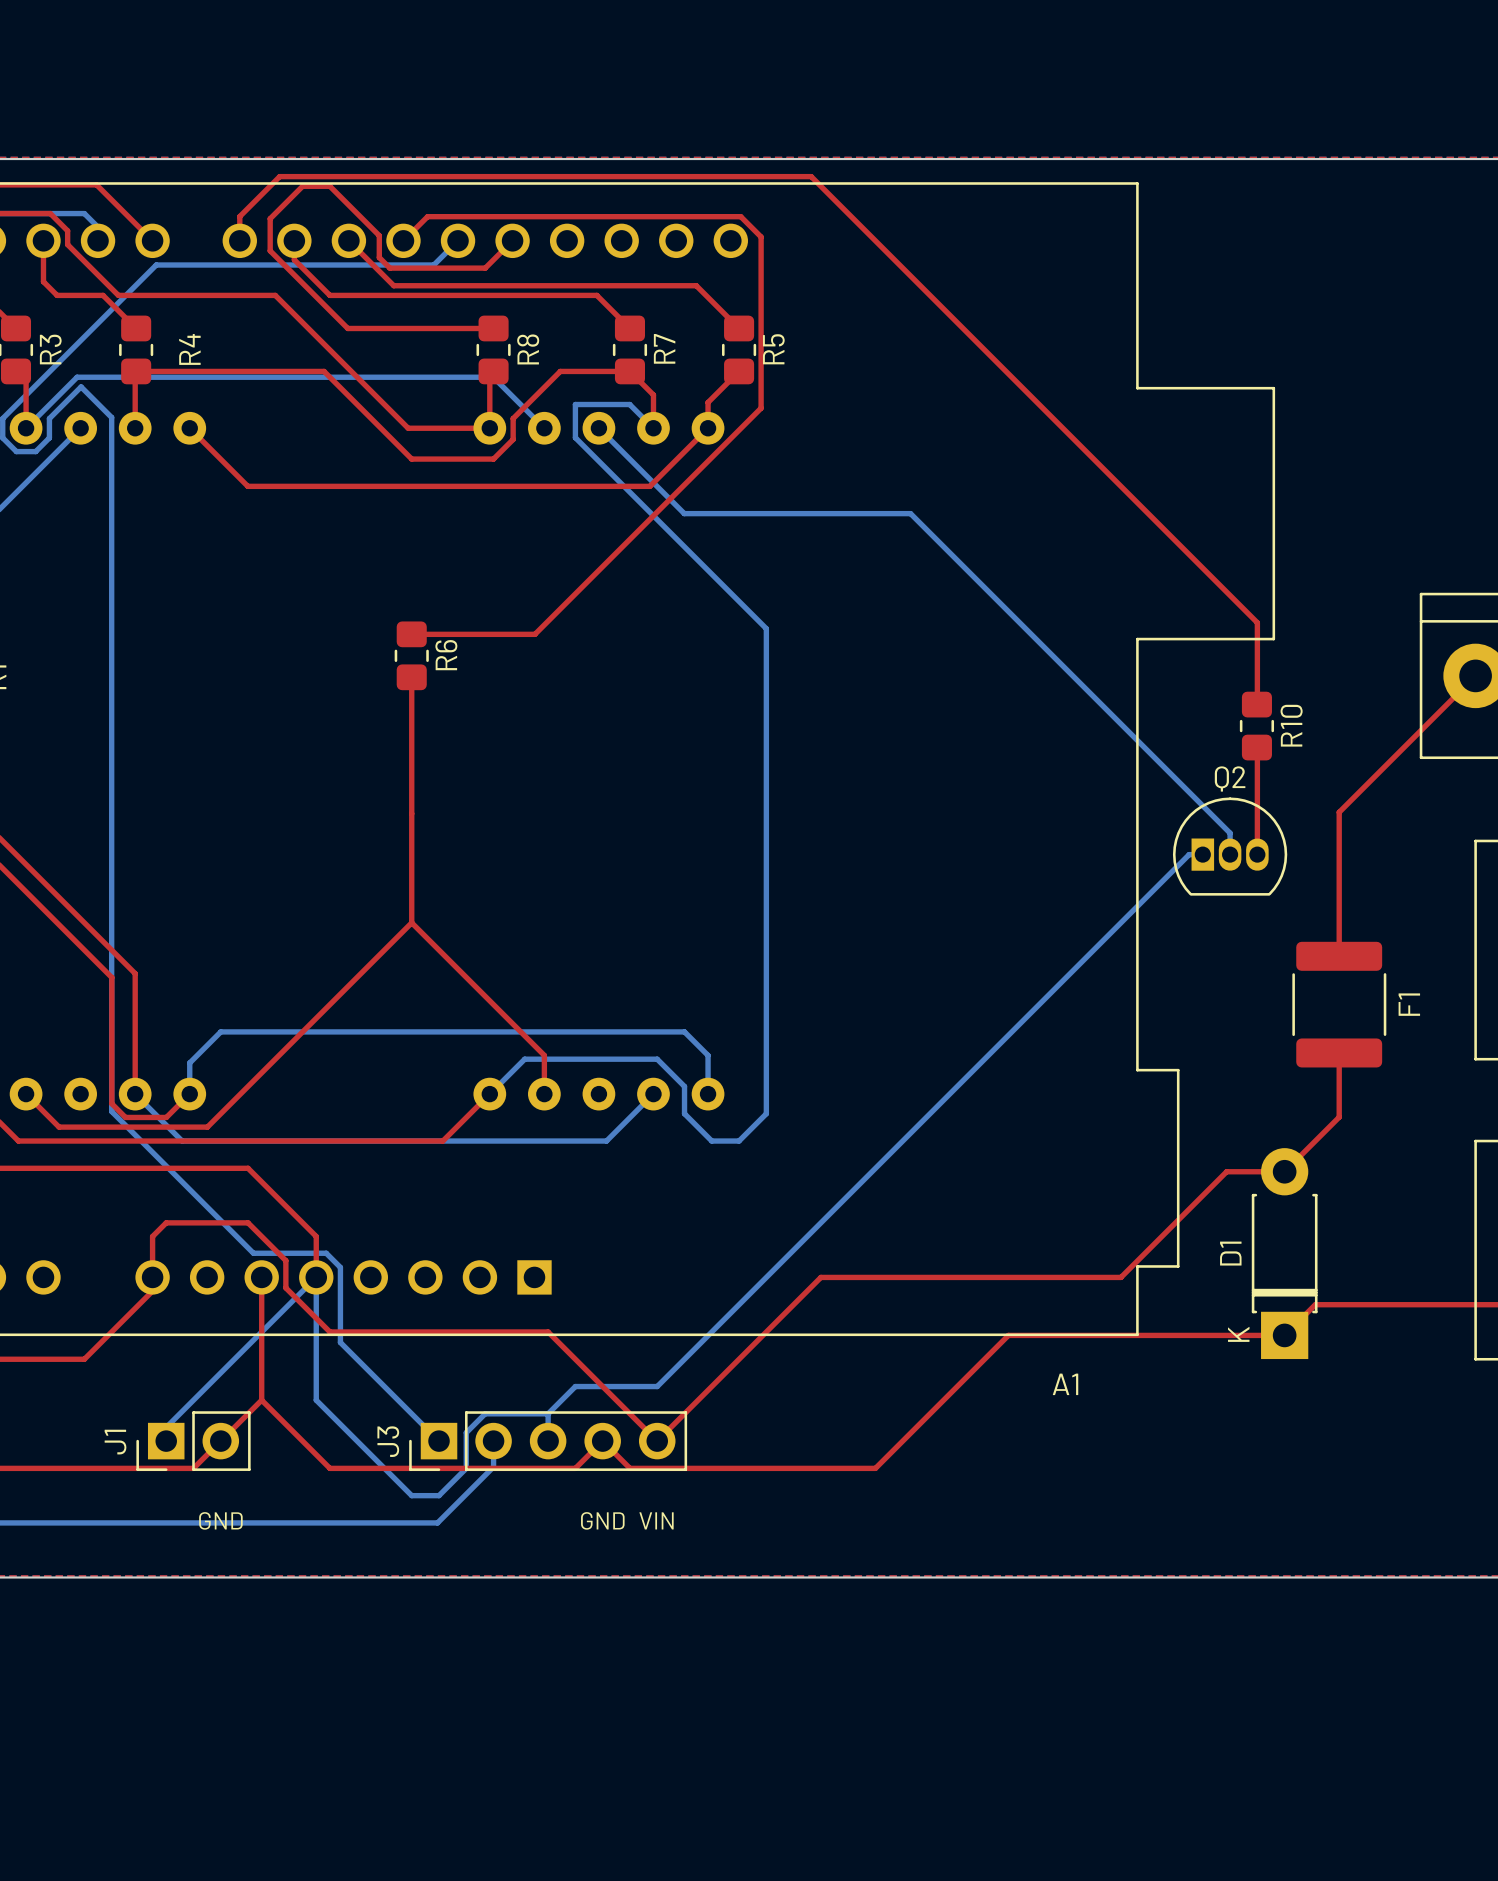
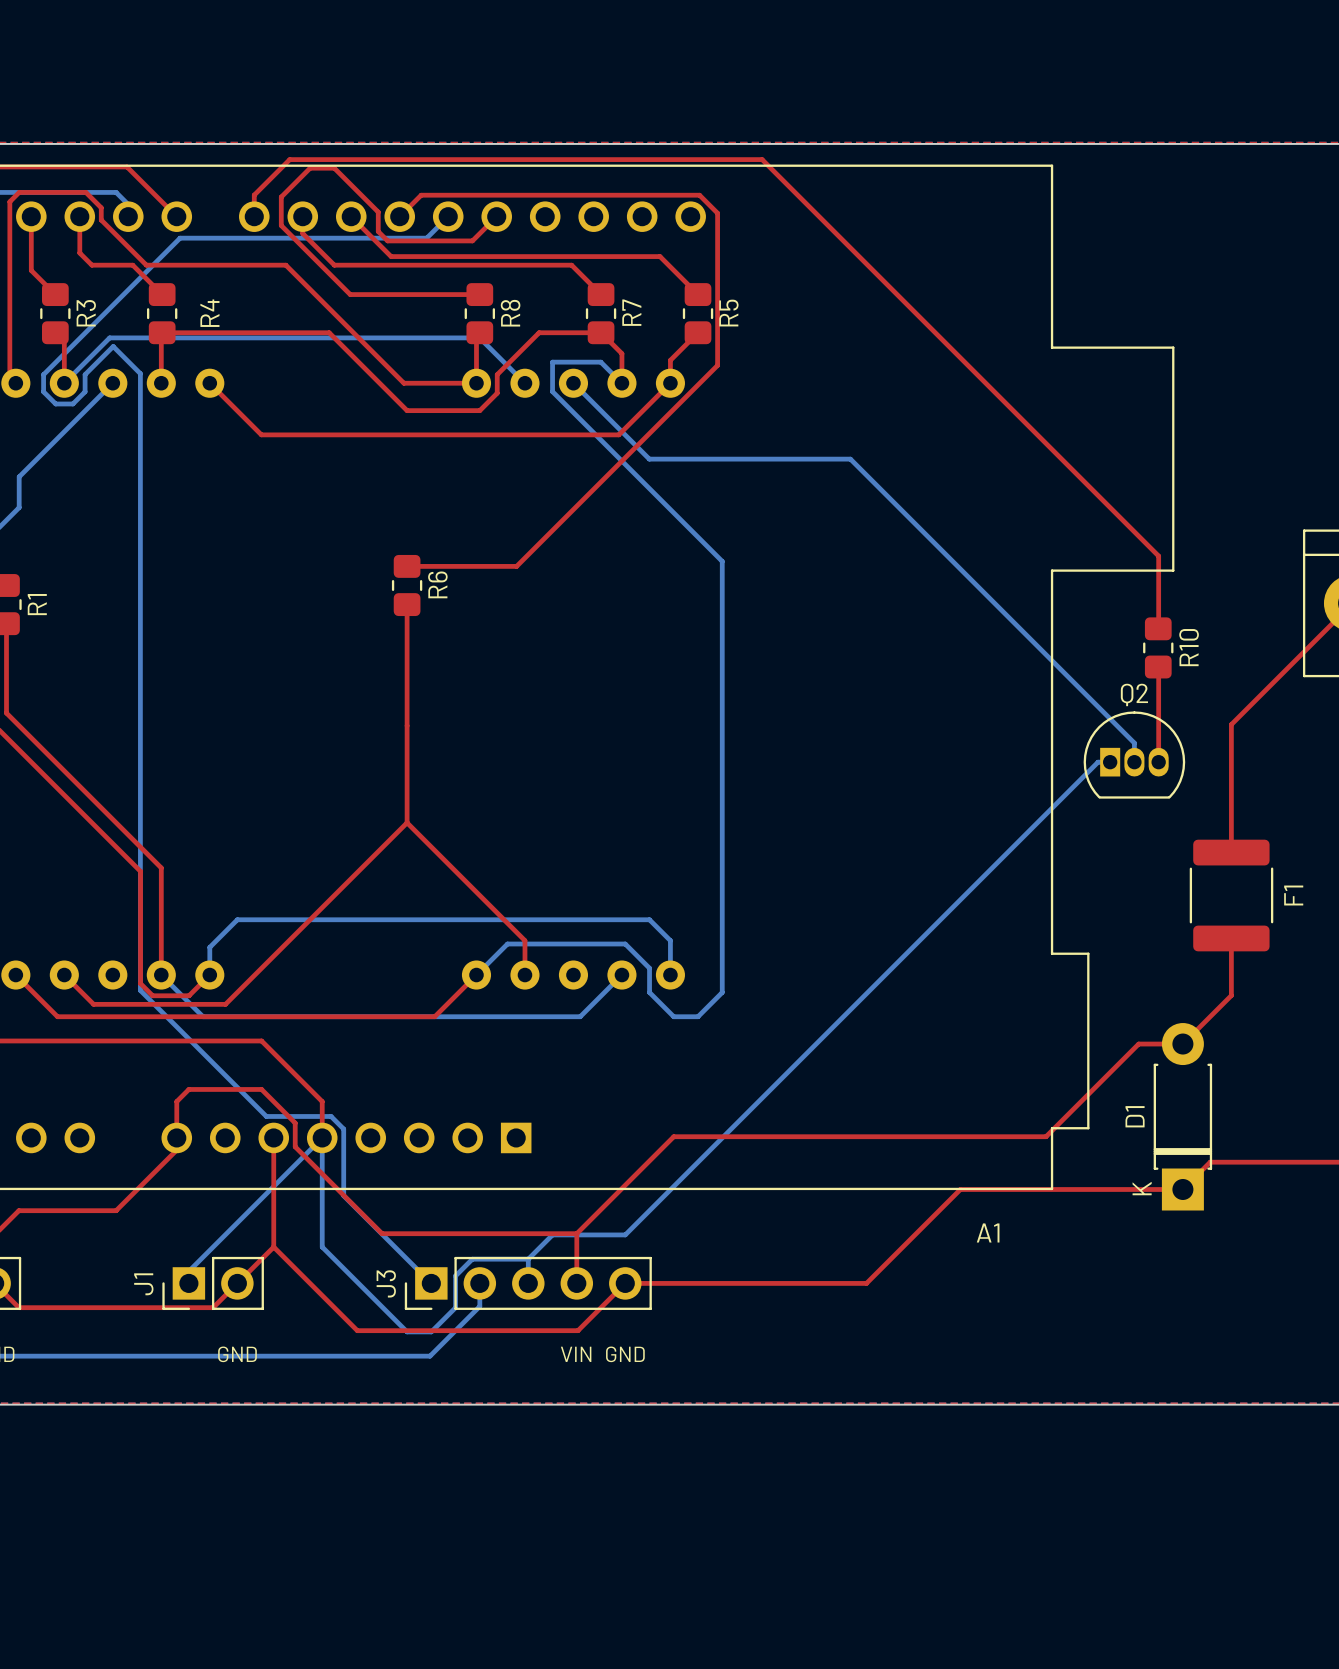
top track: (1234, 1171) (1226, 1171) (1120, 1277) (820, 1277) (657, 1441) (548, 1331) (329, 1331) (285, 1287) -> (1138, 1044) (1046, 1136) (673, 1136) (576, 1233)
top track: none -> (295, 1146) (382, 1233) (576, 1233)
top track: (1034, 1335) (1008, 1335) (875, 1468) (629, 1468) (602, 1441) (575, 1468) (329, 1468) -> (960, 1189) (866, 1283) (625, 1283) (578, 1330) (357, 1330) (334, 1307)
top track: none -> (576, 1233) (576, 1283)
text: GND (602, 1520) -> VIN (576, 1354)
text: VIN (656, 1520) -> GND (625, 1354)

